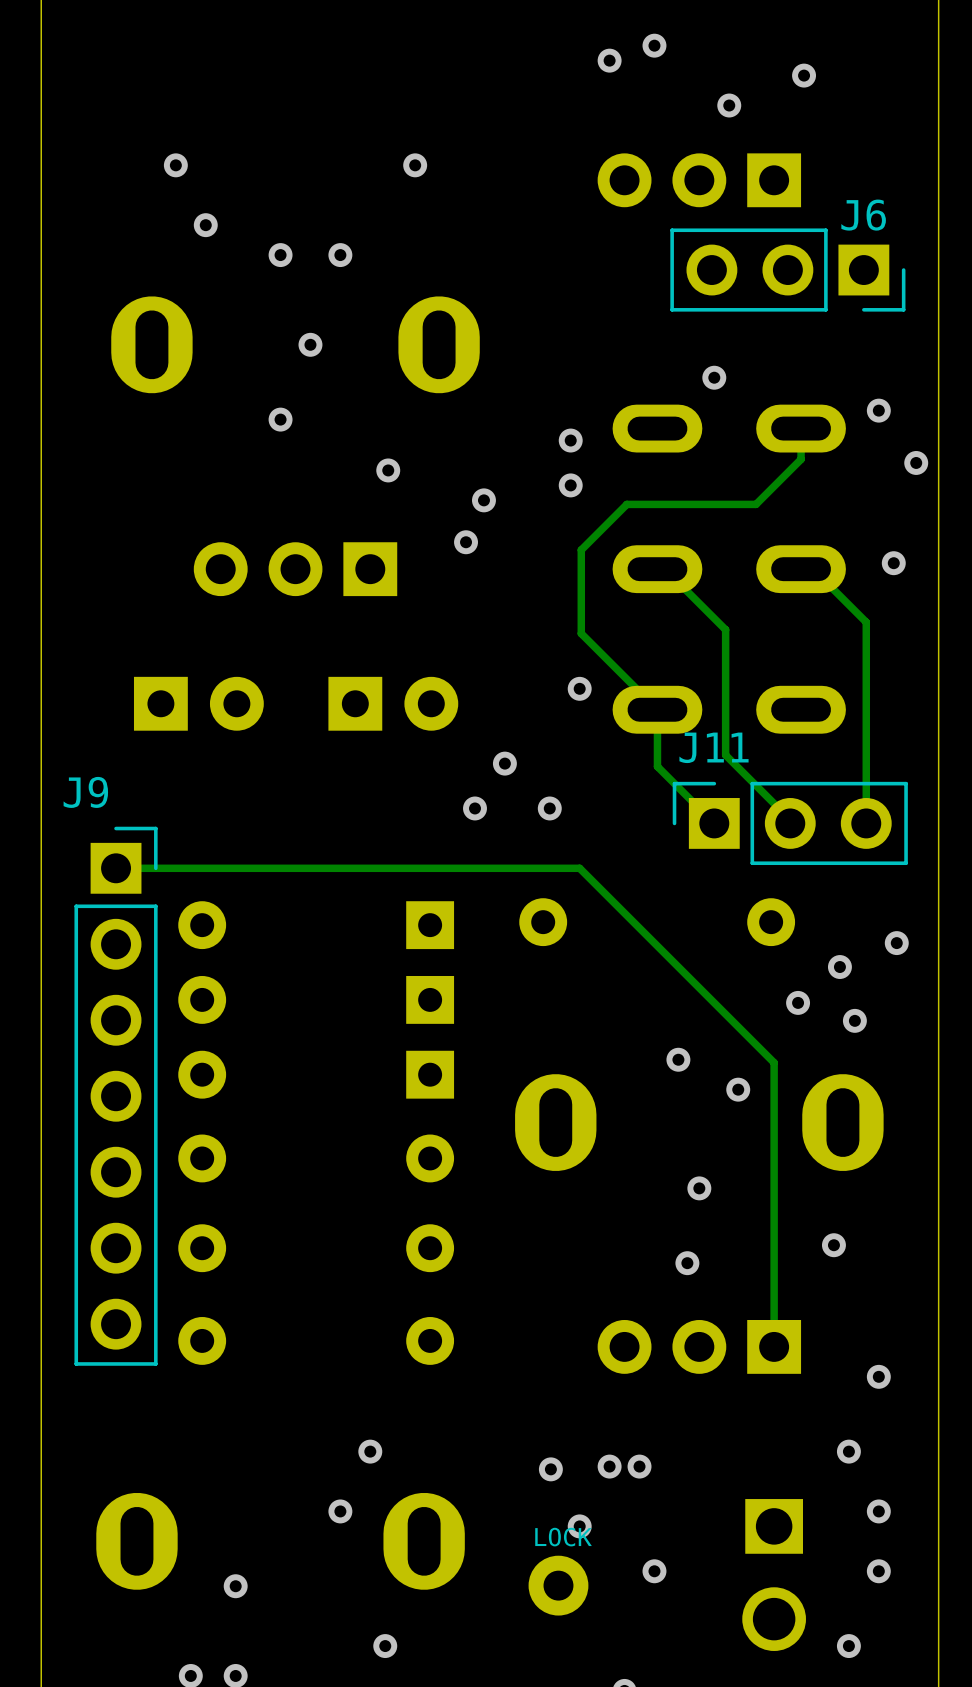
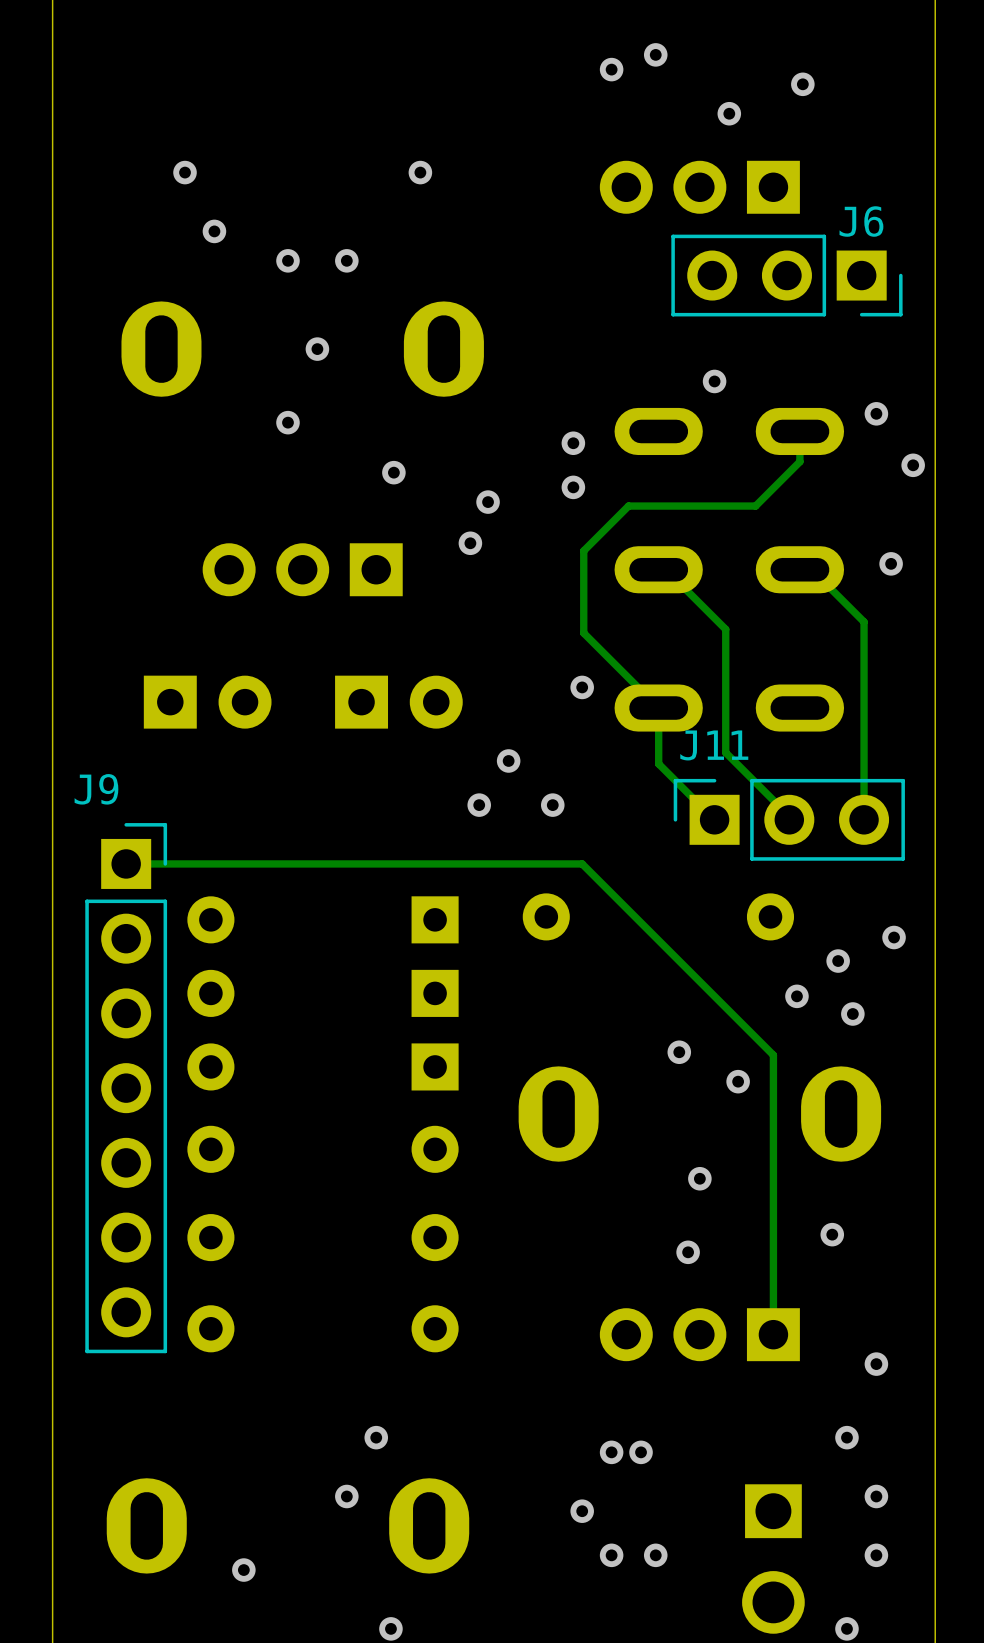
via position: (550, 1469) -> (611, 1555)
text: LOCK (563, 1537) -> none
part: (558, 1585) -> none

